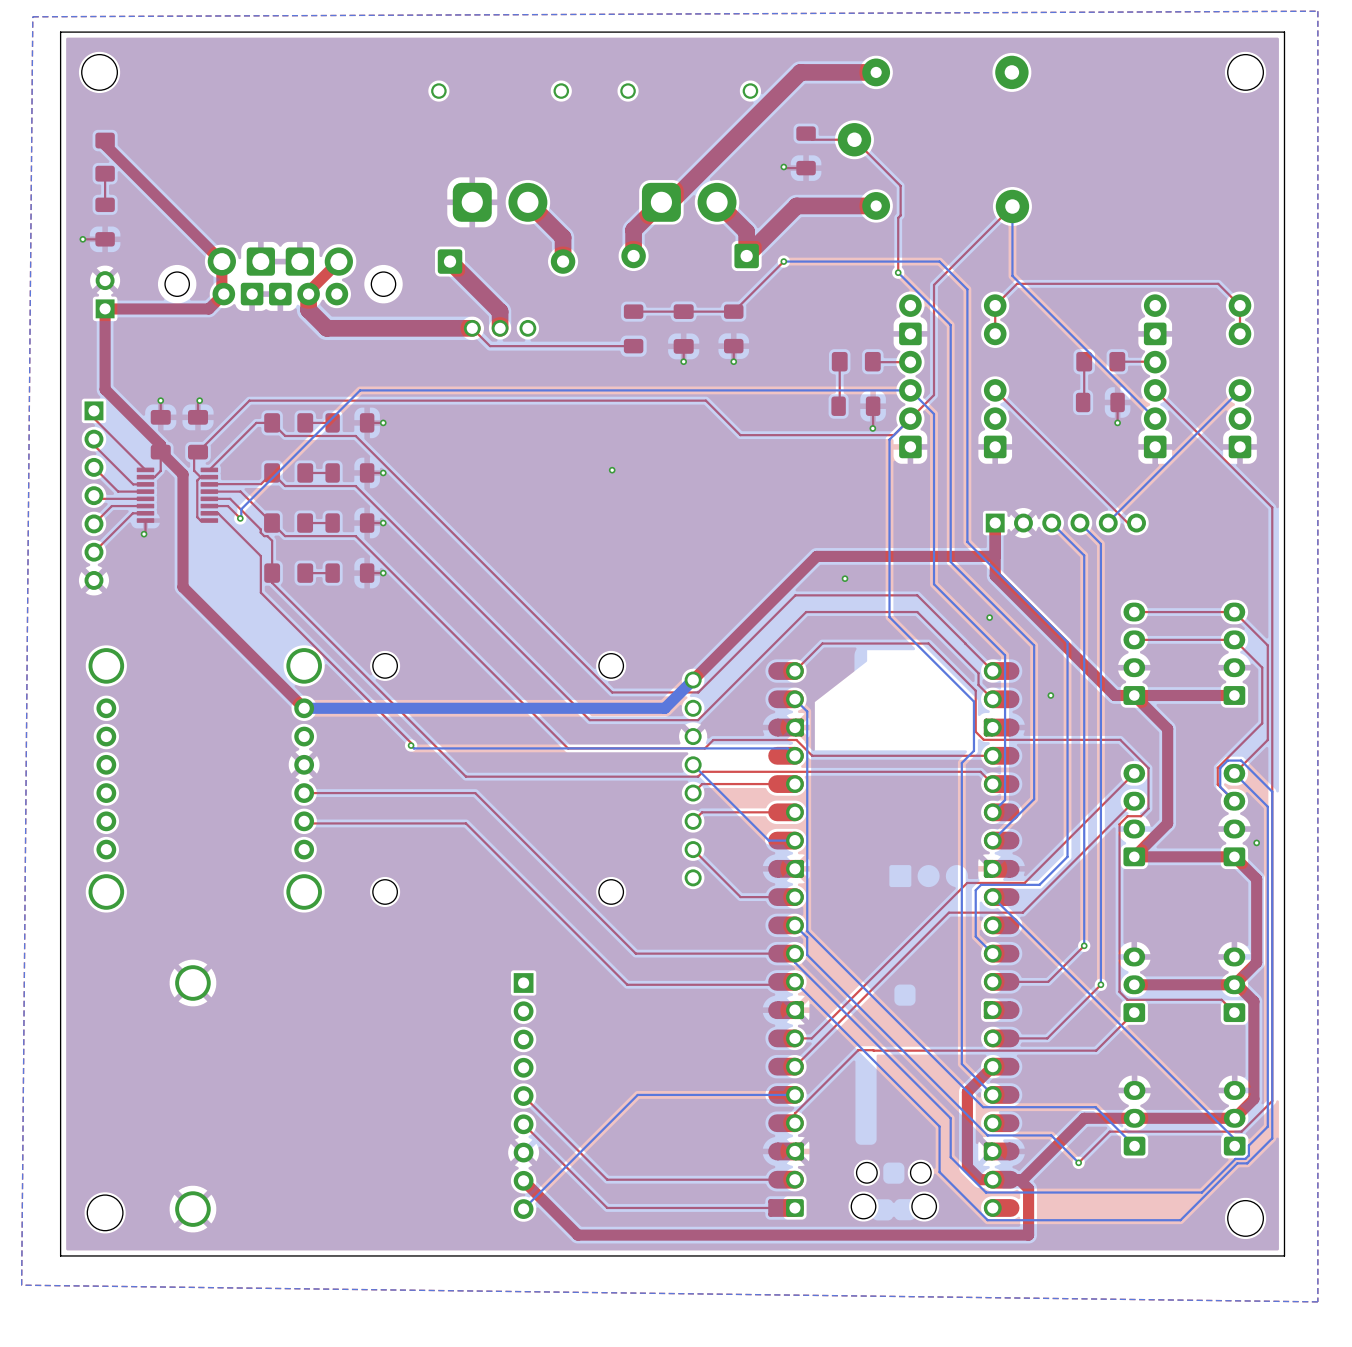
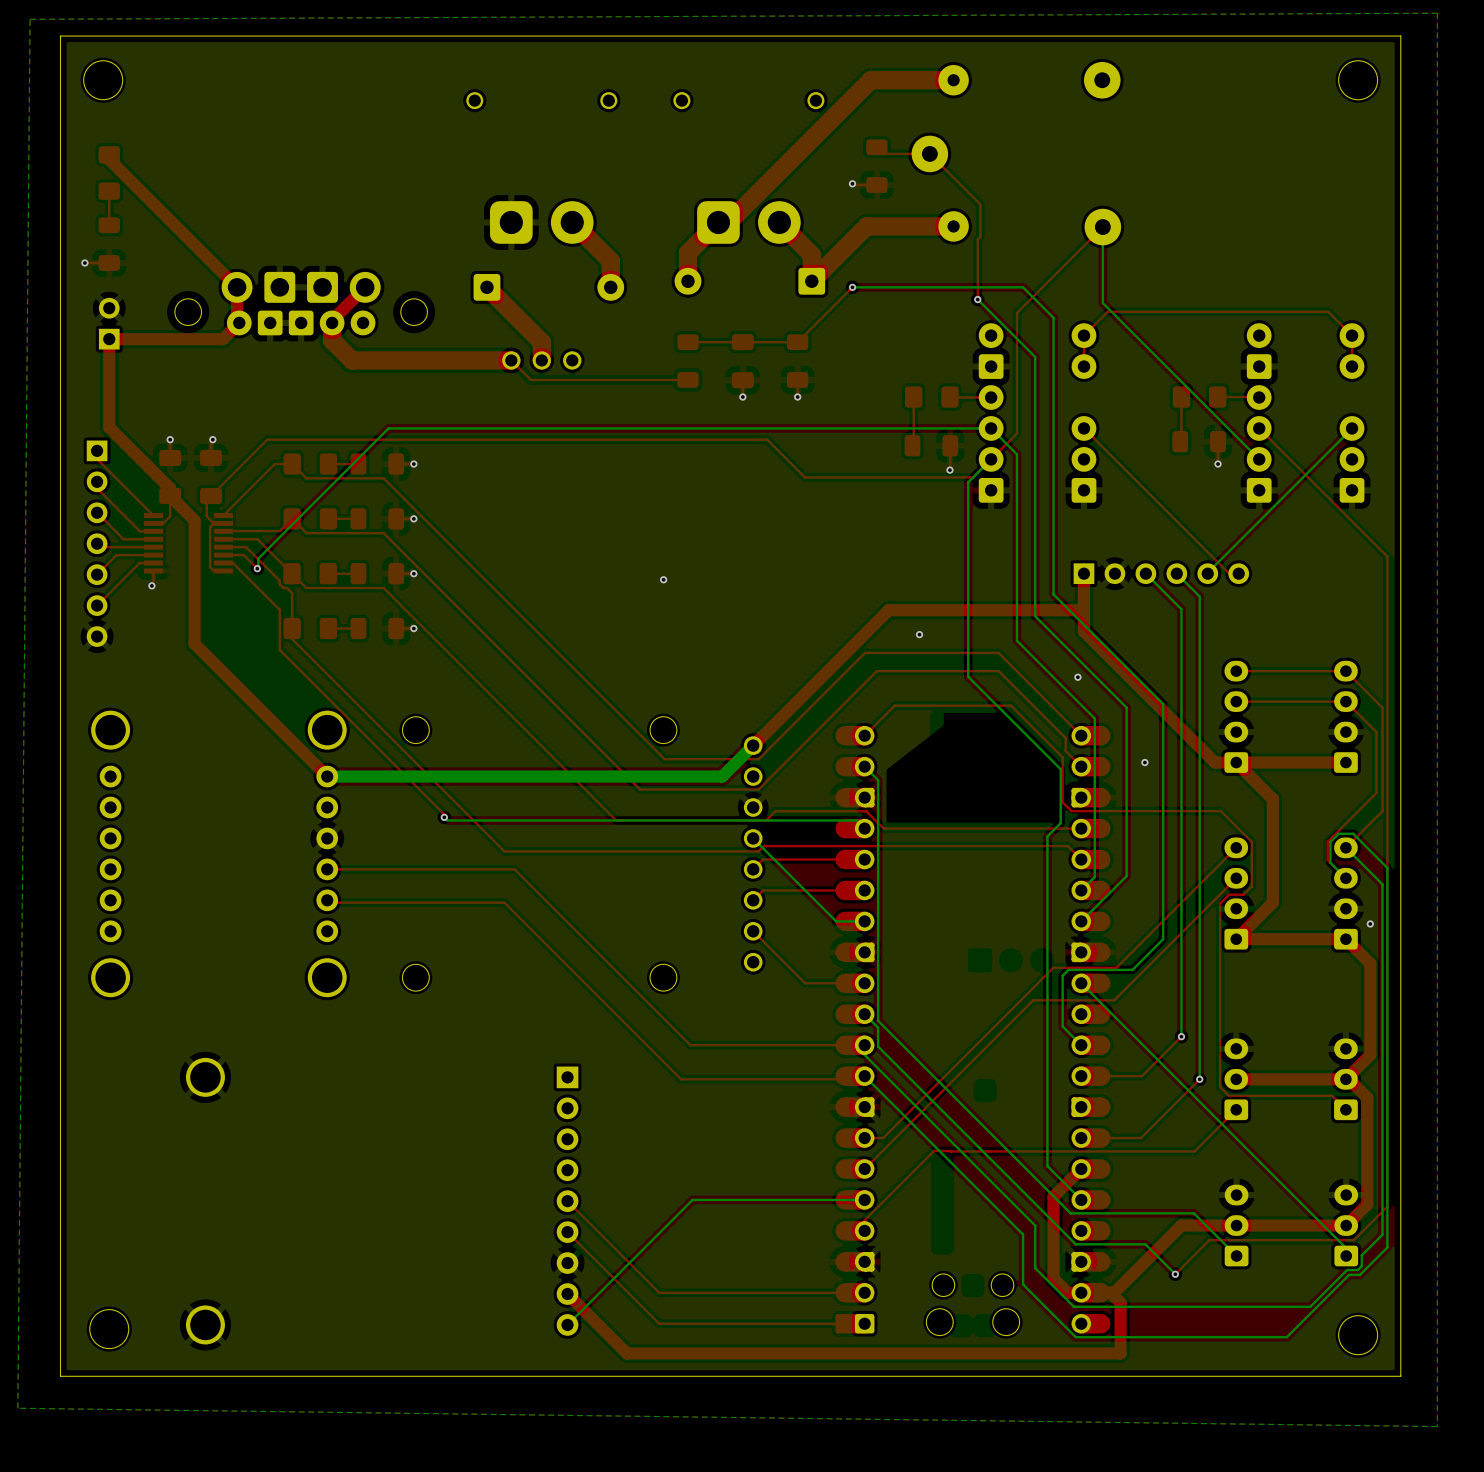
via position: (612, 470) -> (663, 579)

